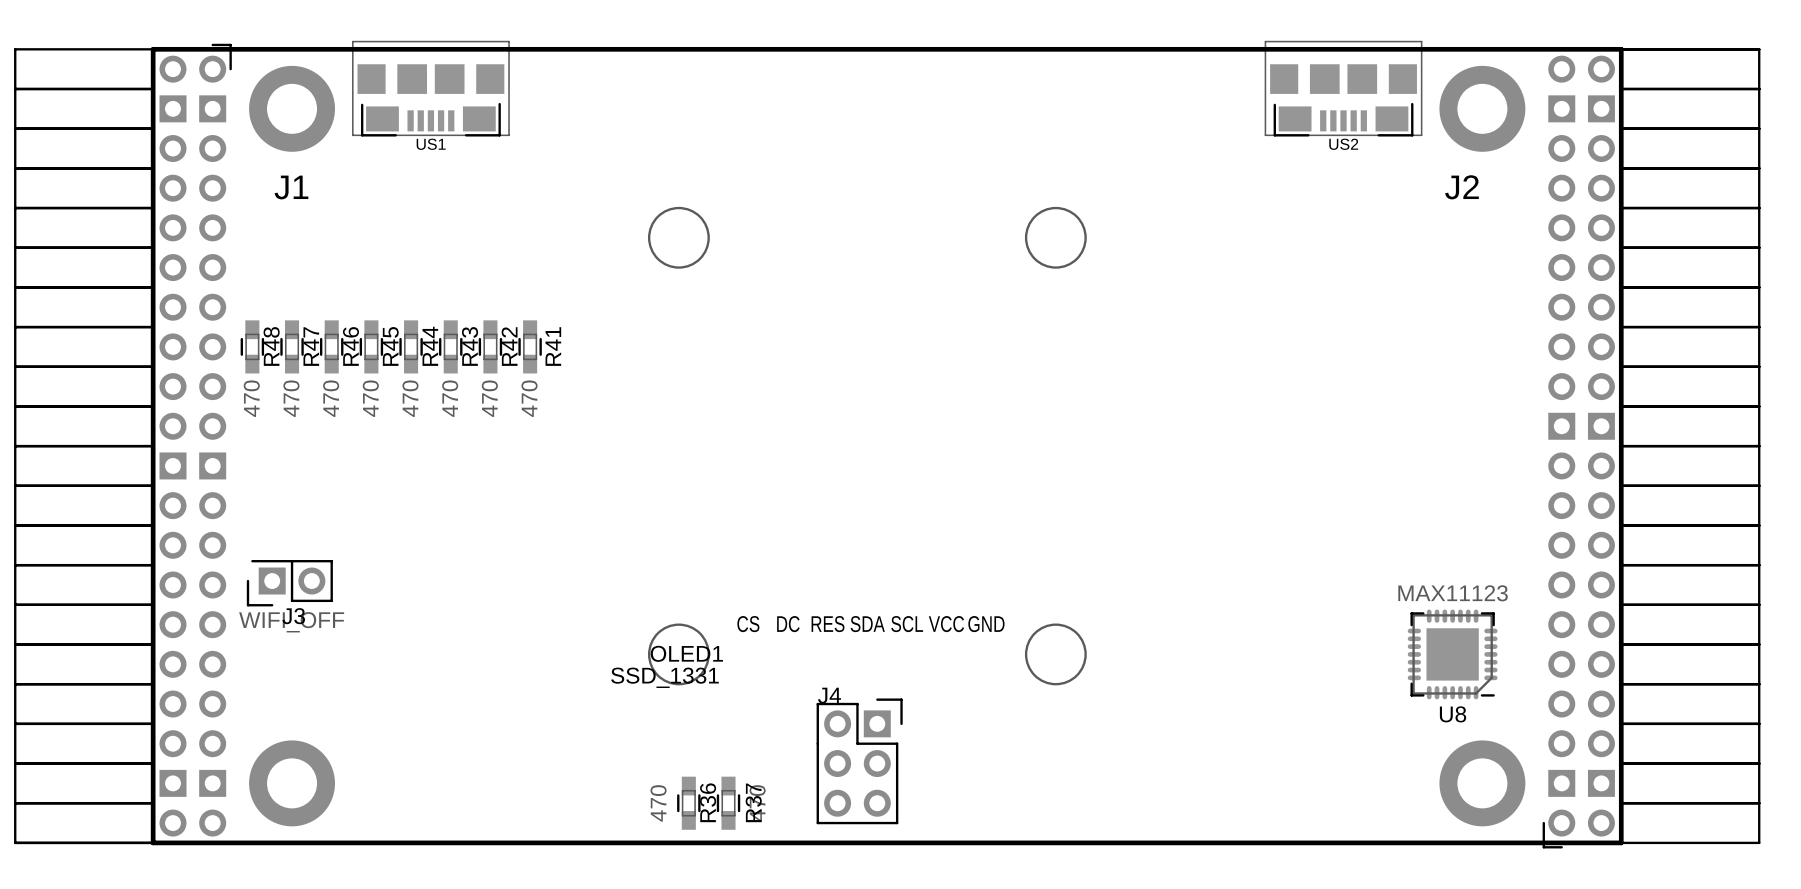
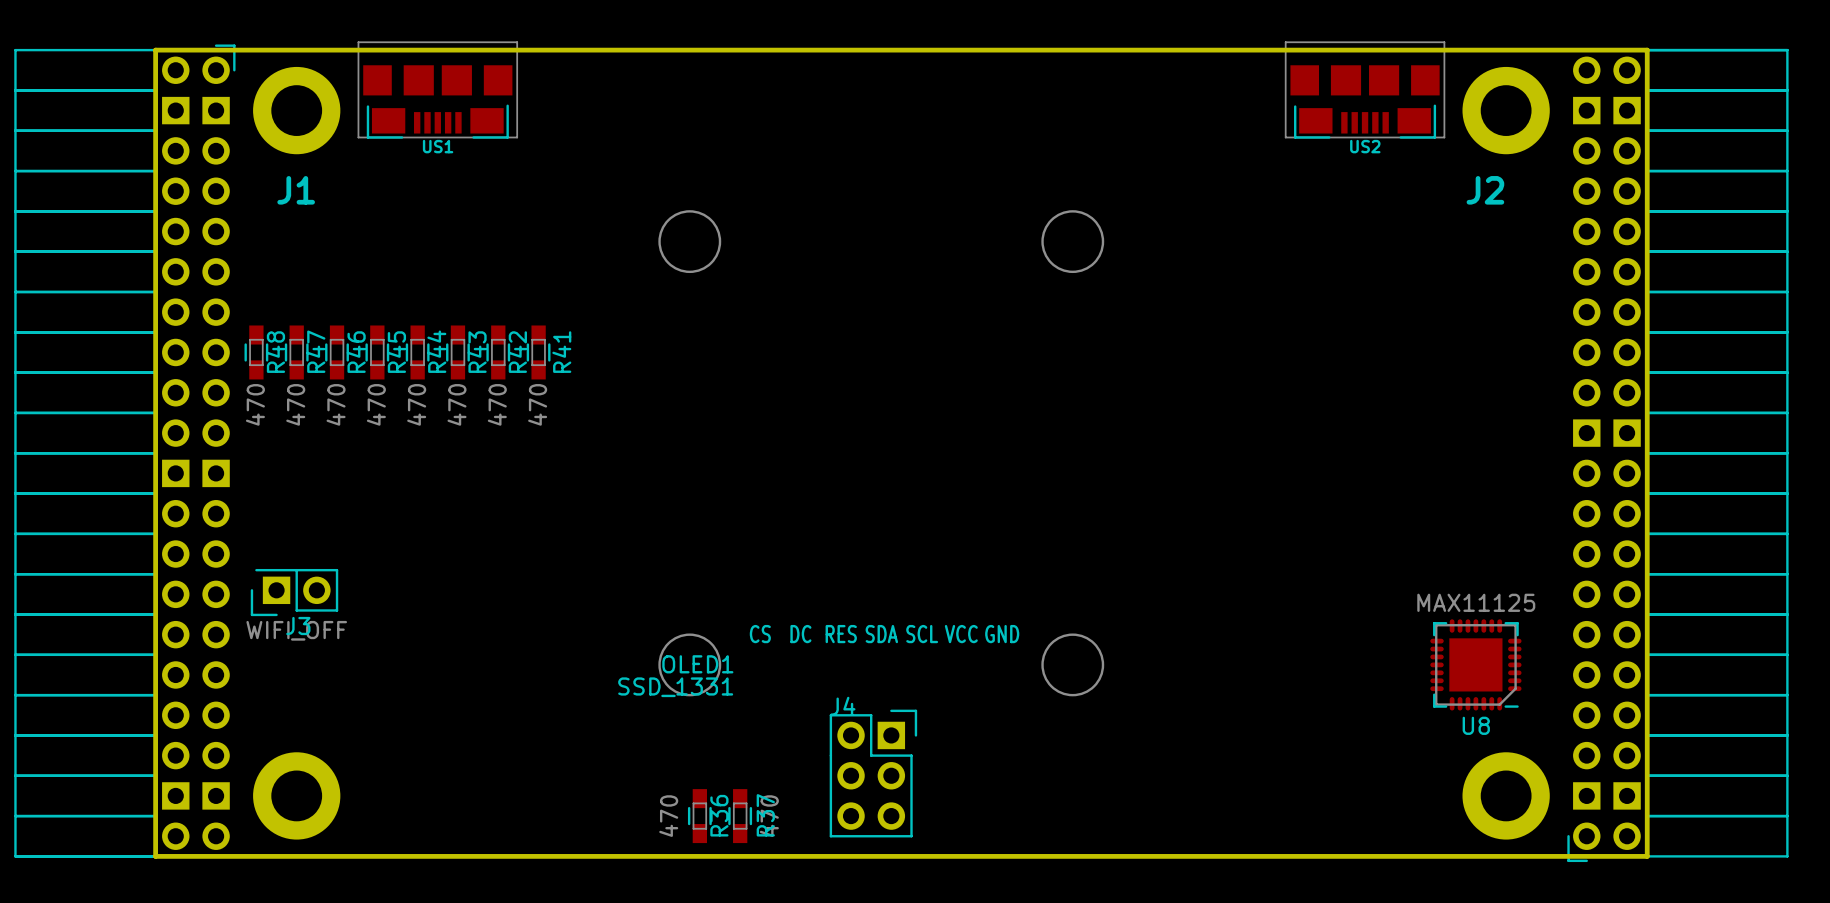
U8 value: MAX11123 (1453, 593) -> MAX11125 (1476, 602)

